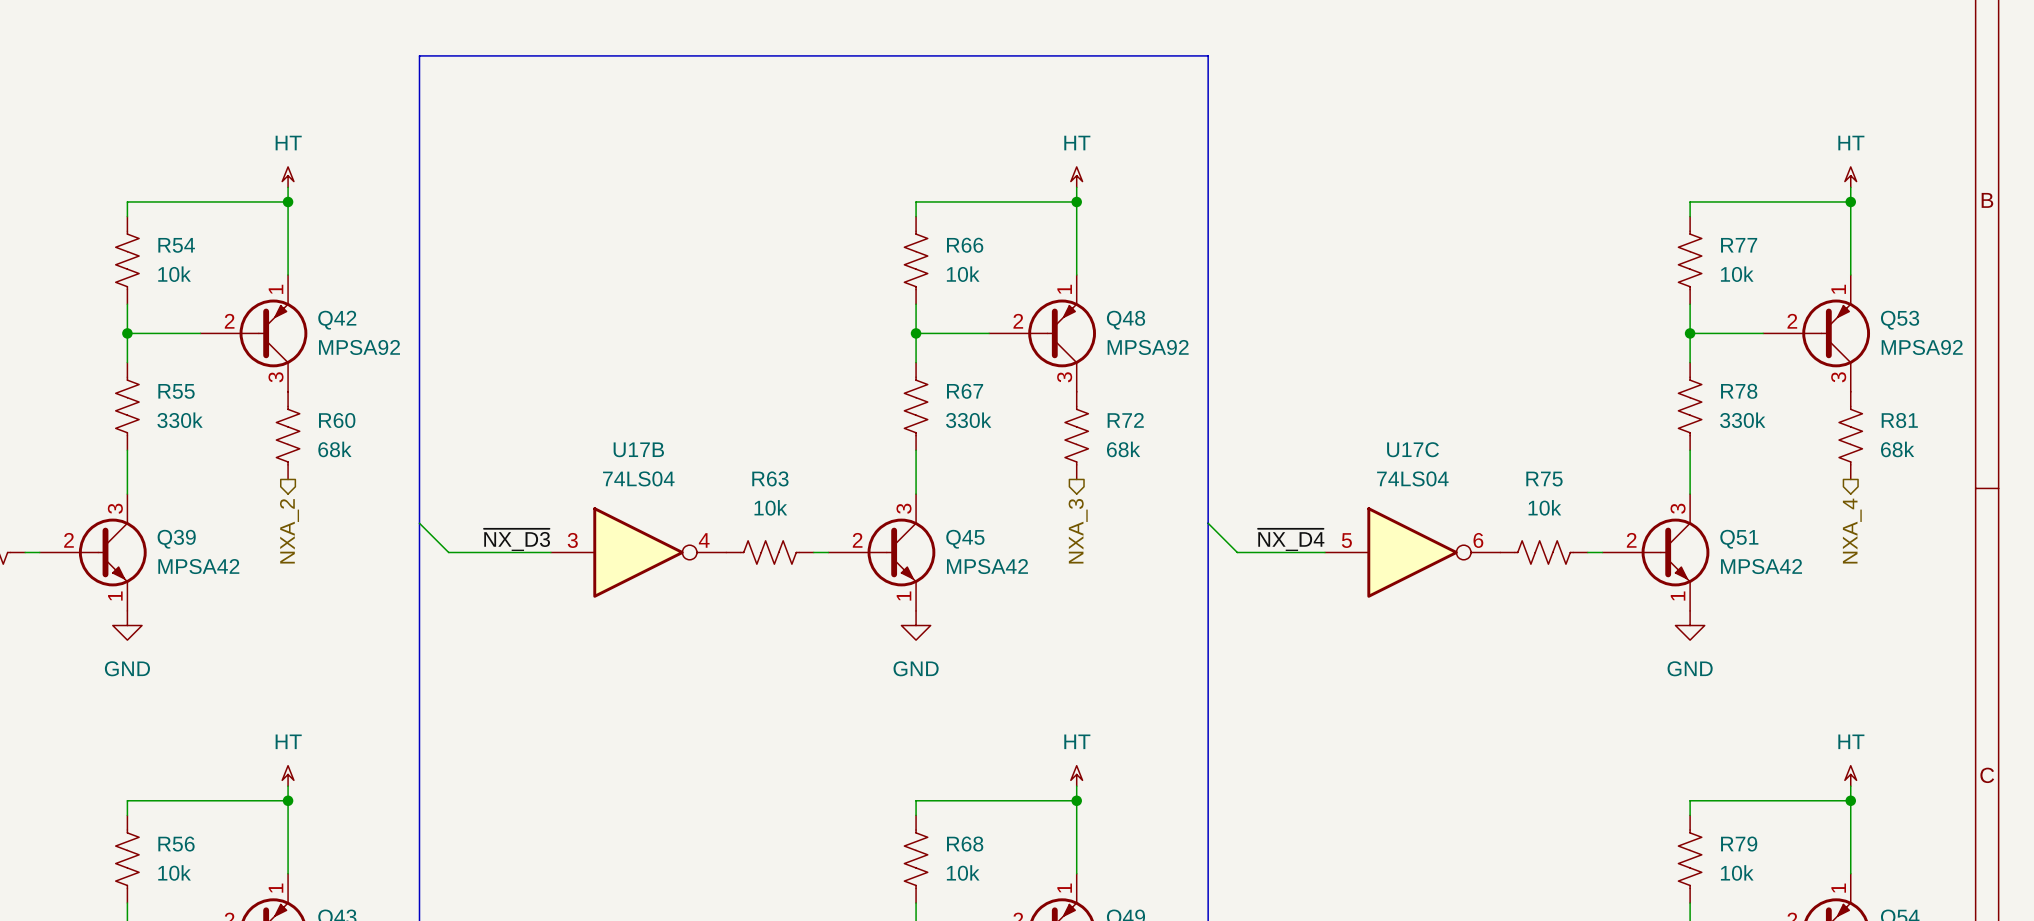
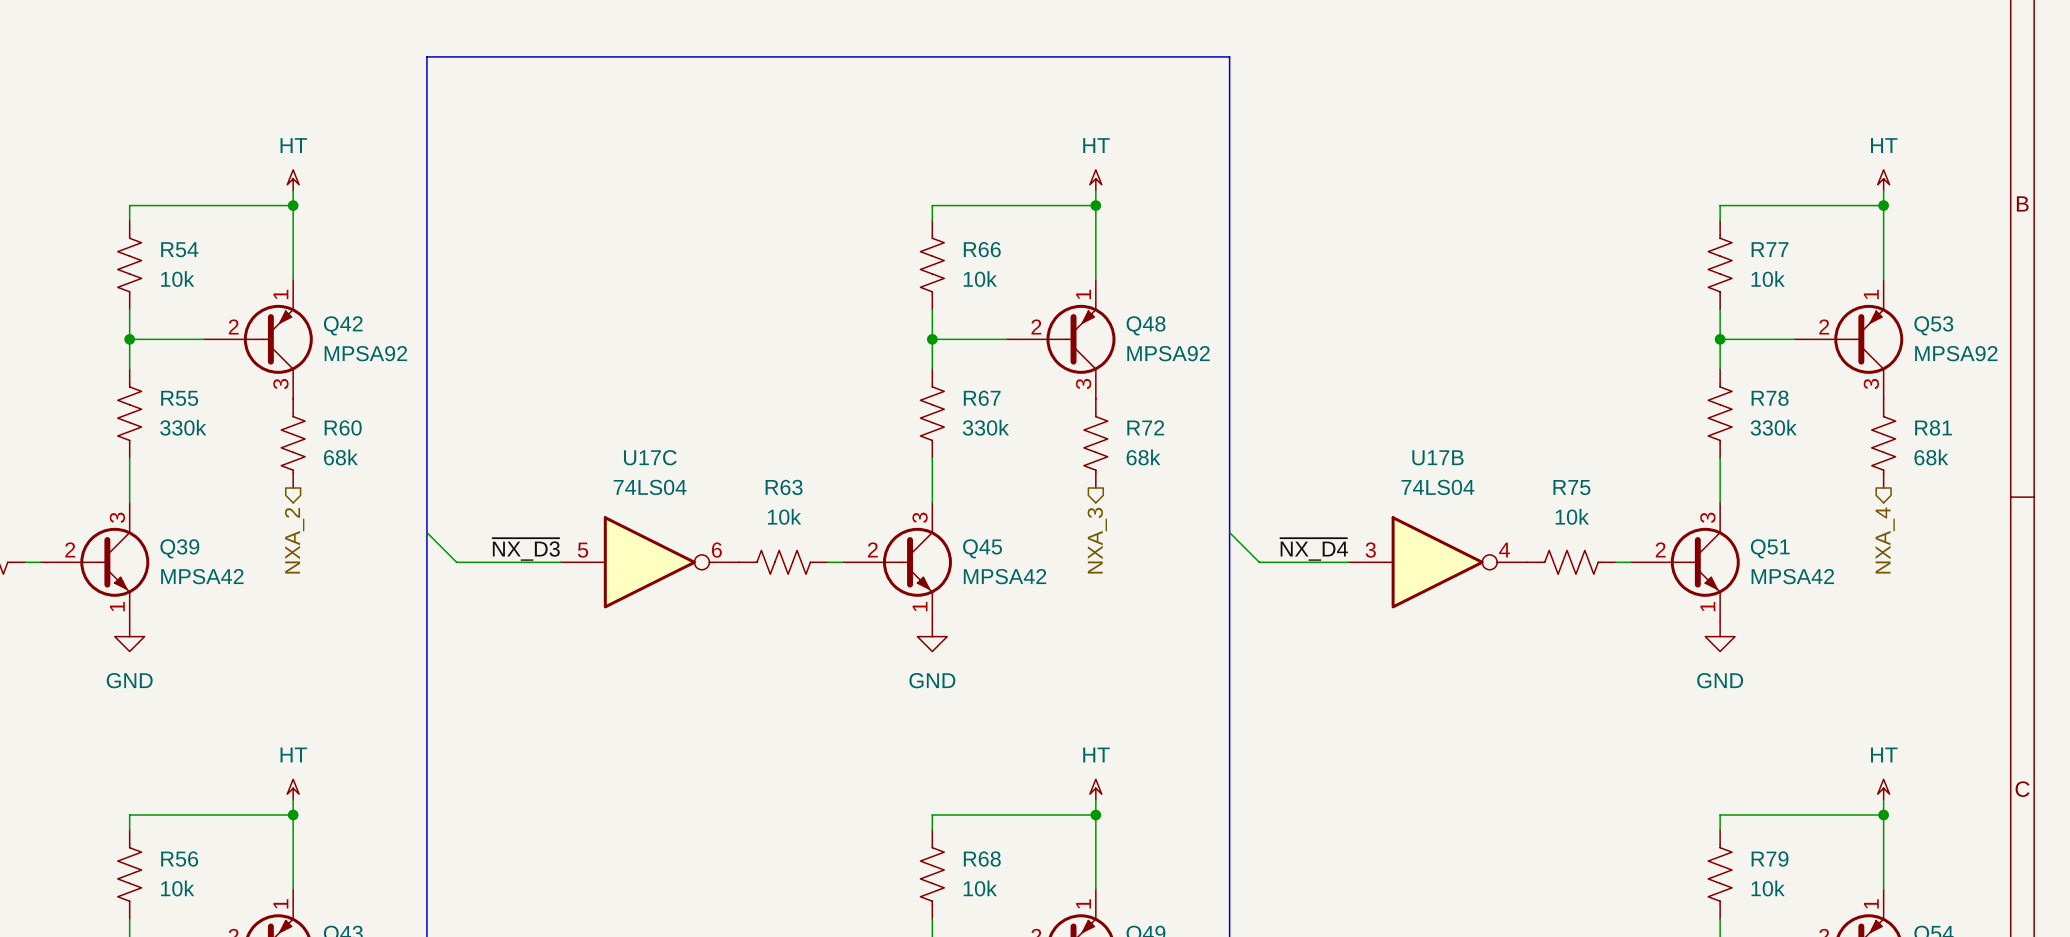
U17B position: (638, 552) -> (1437, 562)
U17C position: (1412, 552) -> (649, 562)

